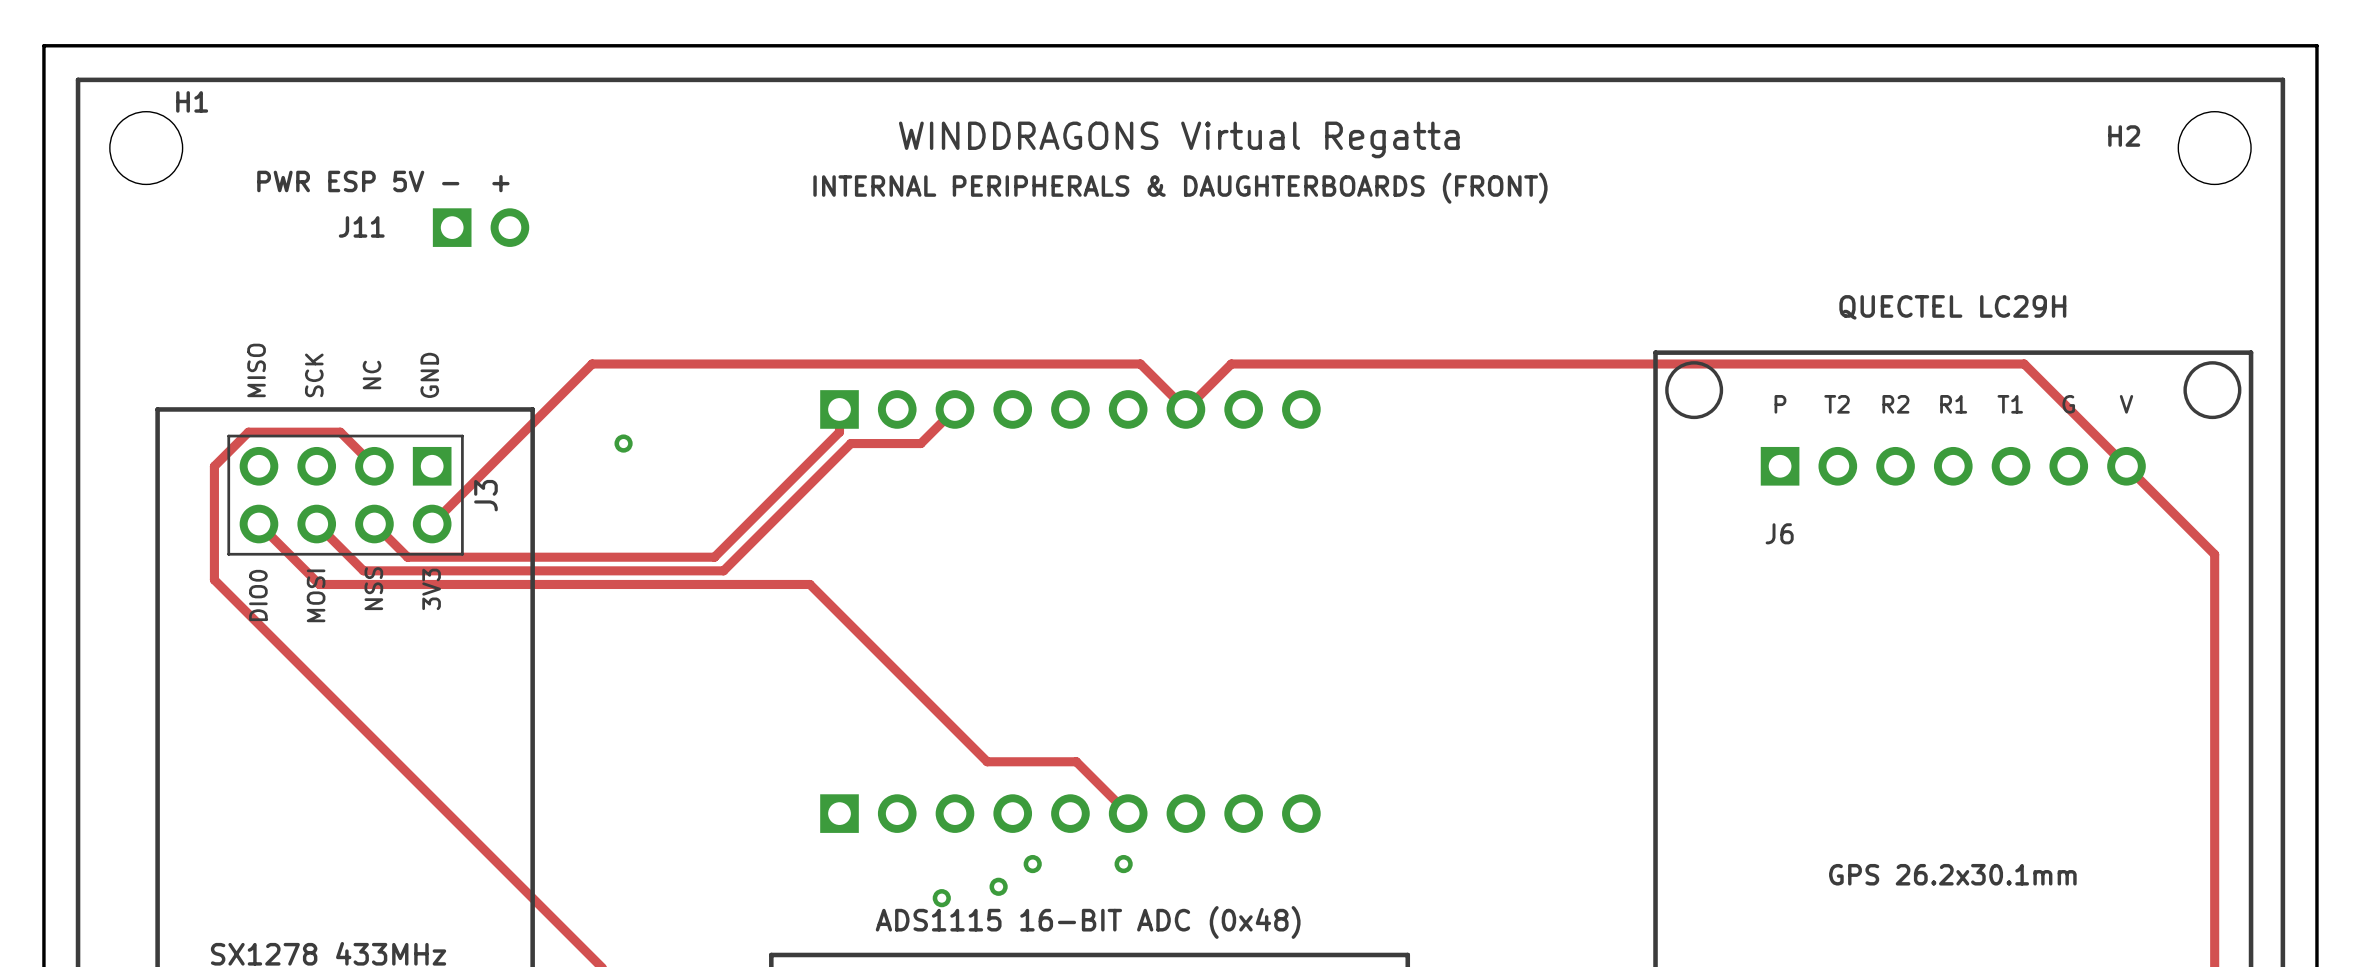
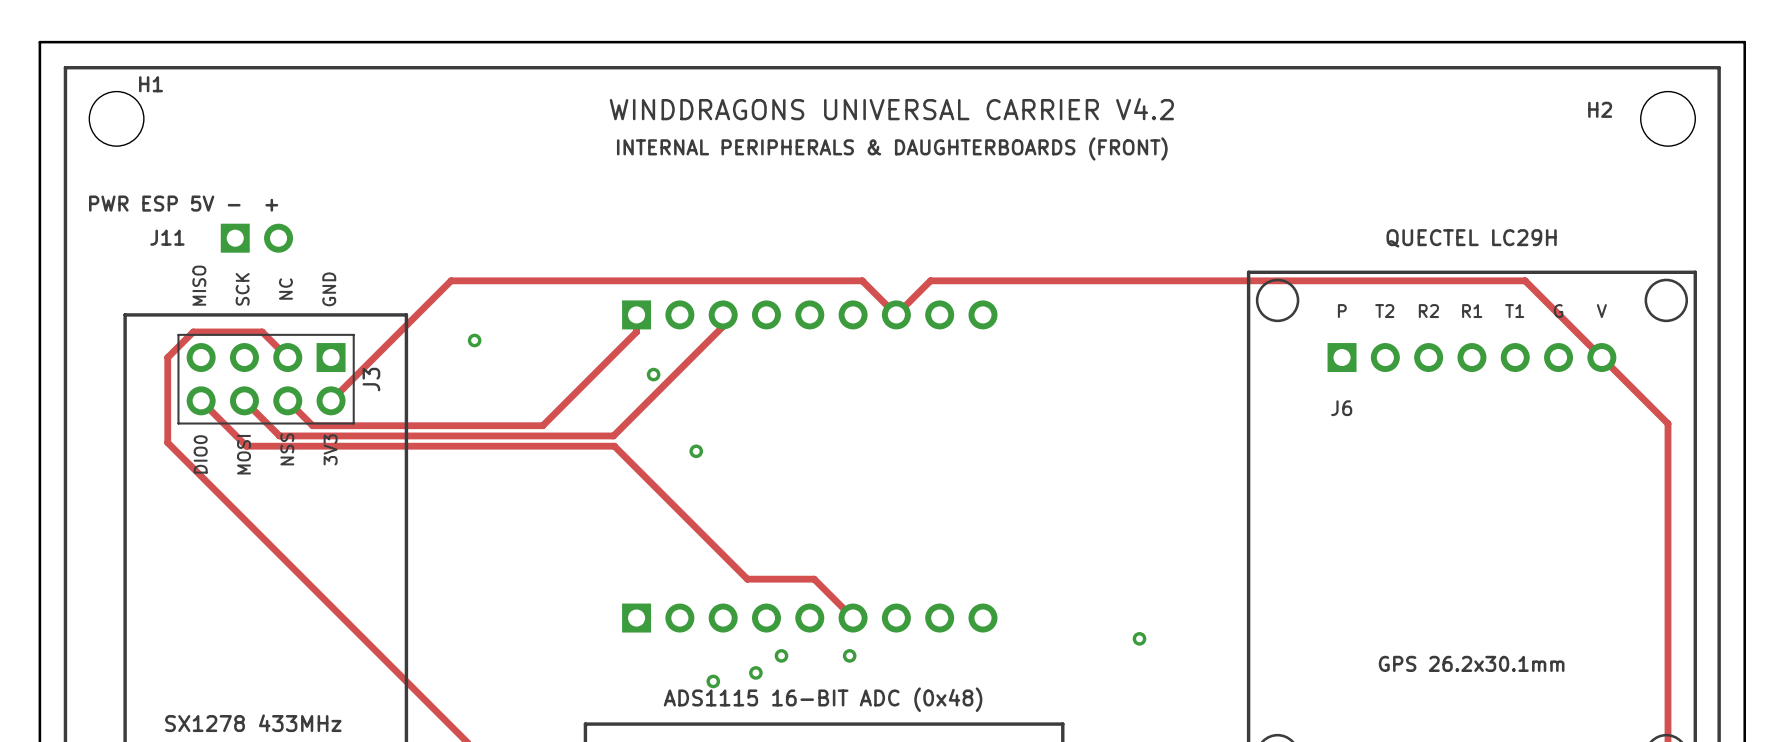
text: WINDDRAGONS Virtual Regatta (1179, 139) -> WINDDRAGONS UNIVERSAL CARRIER V4.2 (891, 109)
text position: PWR ESP 5V (340, 181) -> PWR ESP 5V (151, 203)
text position: - + (475, 183) -> - + (252, 205)
J11 position: (481, 227) -> (256, 238)
track: (954, 409) (920, 443) (850, 443) (723, 570) -> (723, 314) (723, 326) (613, 435) (549, 435)
via: none -> (653, 374)
via: none -> (696, 451)
via: none -> (1139, 638)

